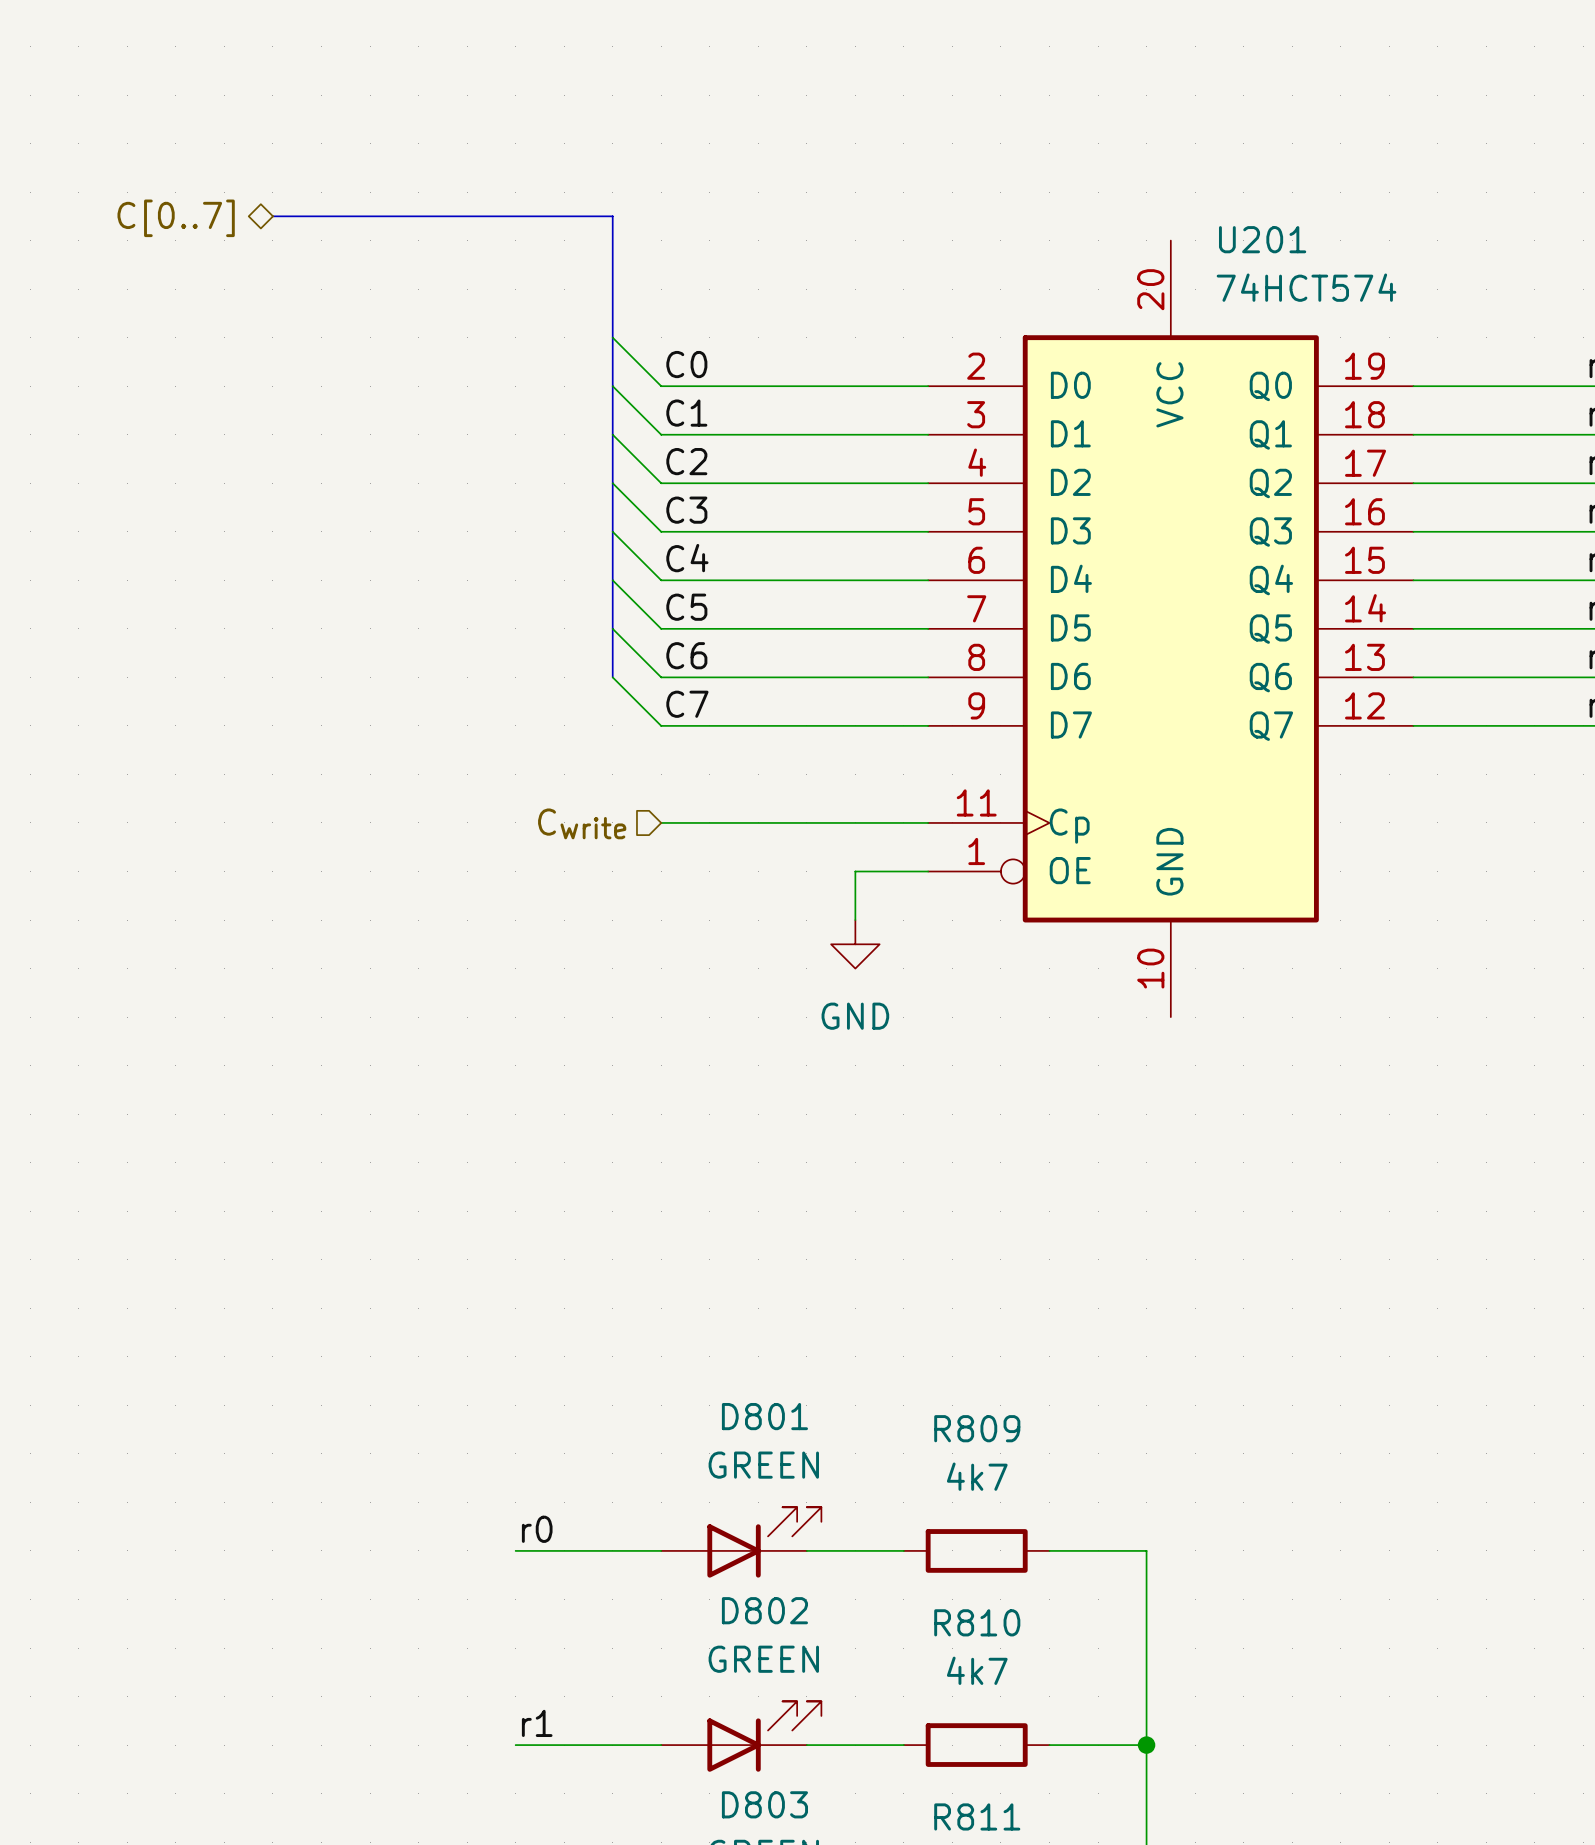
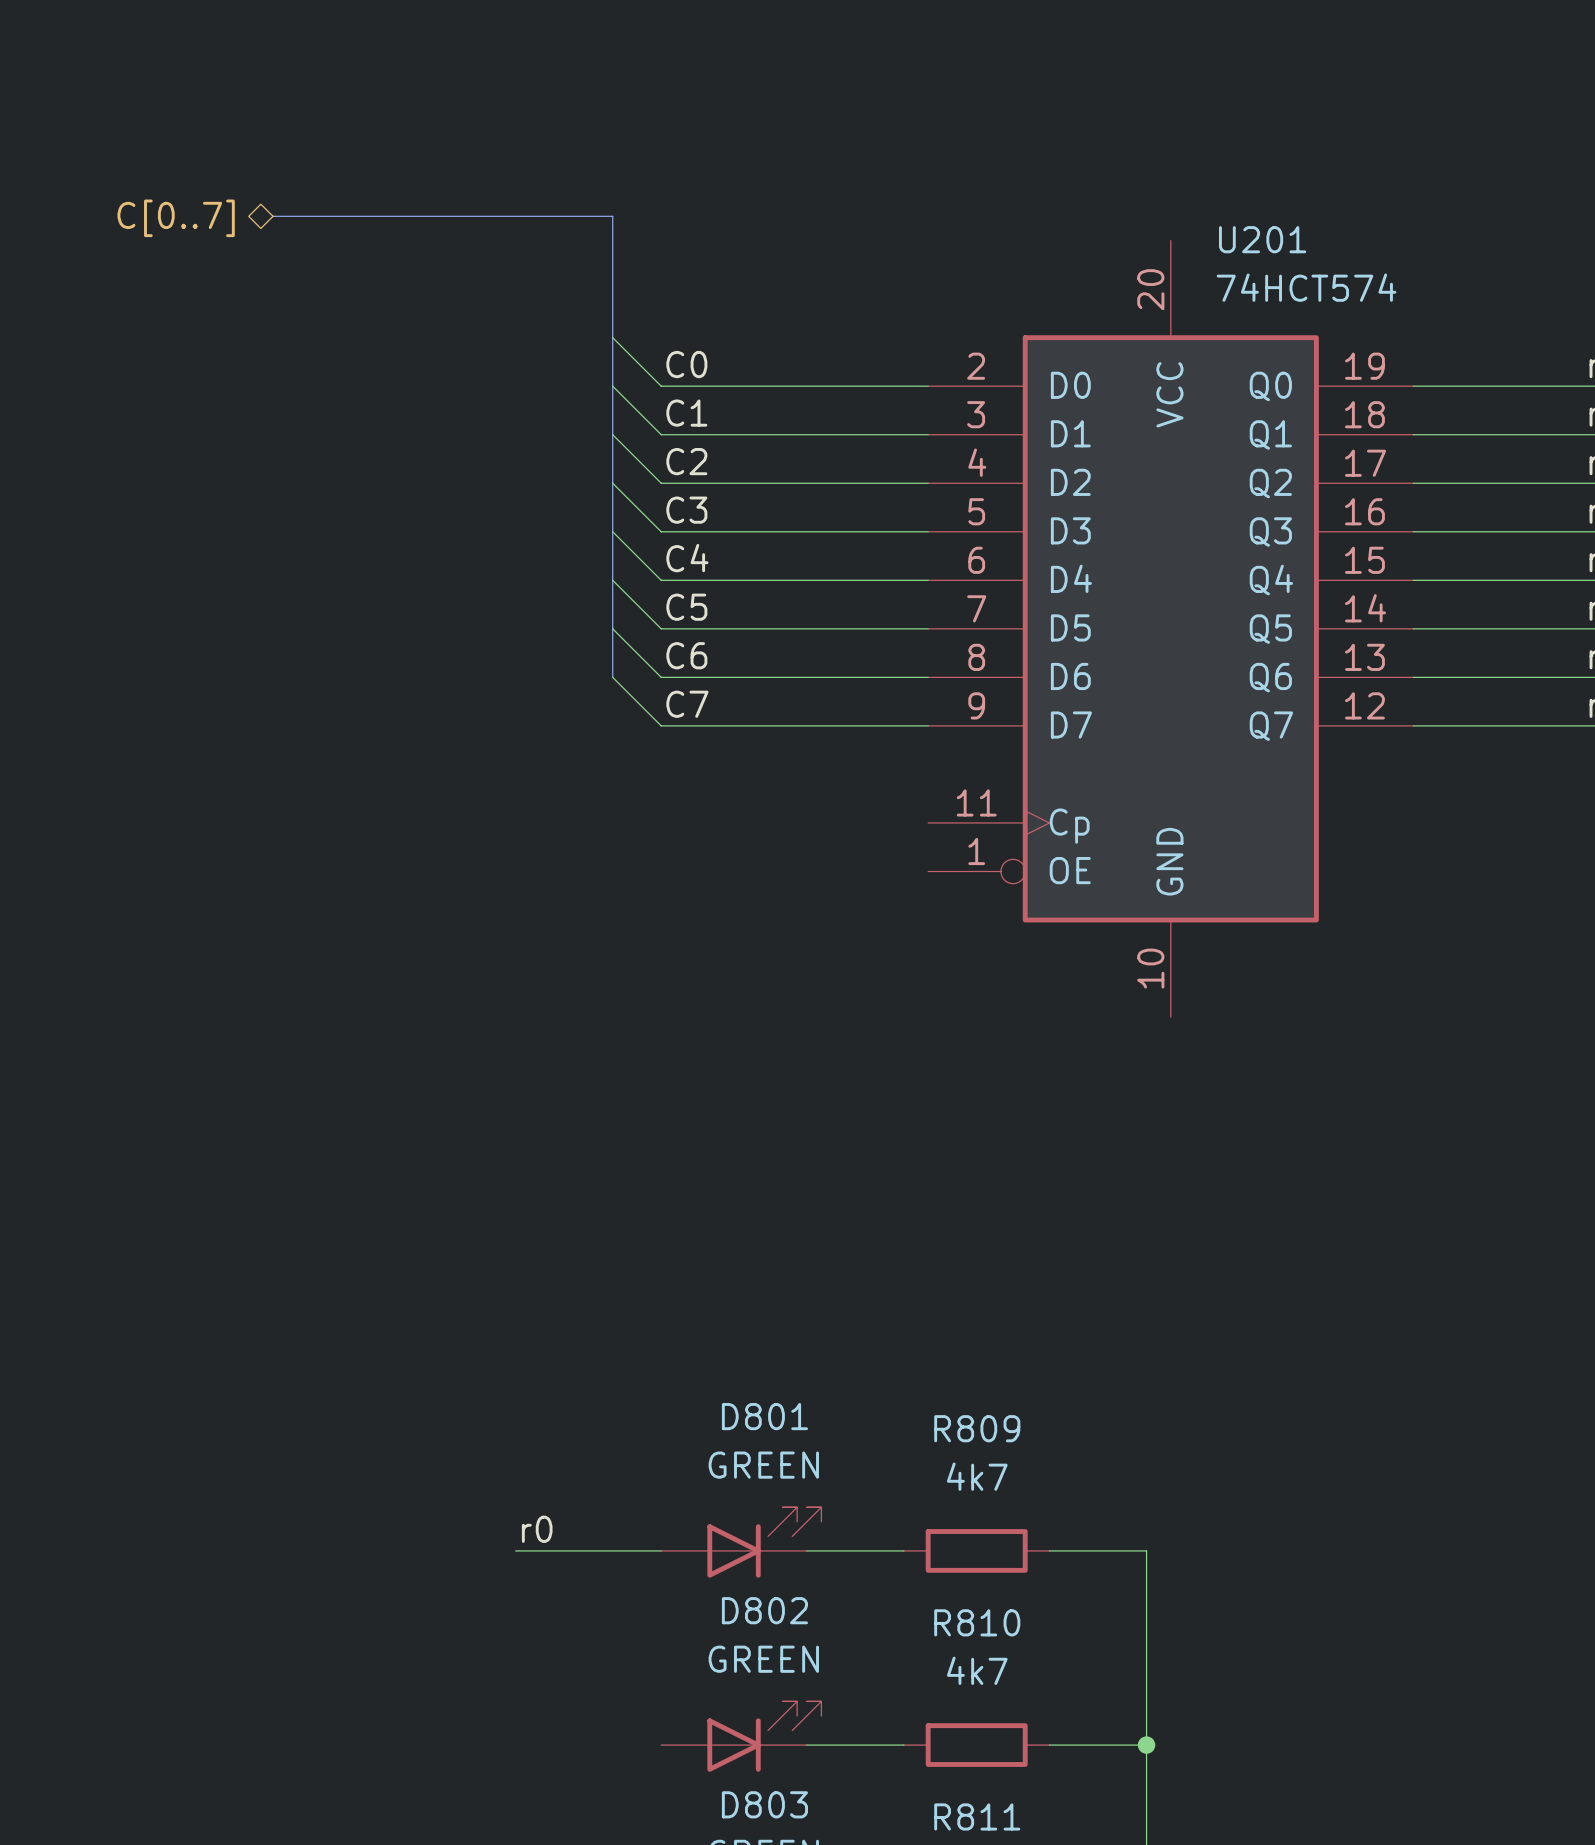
wire: (661, 822) (928, 822) -> none
hierarchical label: Cwrite (582, 823) -> none
wire: (928, 871) (855, 871) (855, 920) -> none
power symbol: GND (855, 944) -> none
label: r1 (537, 1723) -> none
wire: (515, 1745) (661, 1745) -> none

